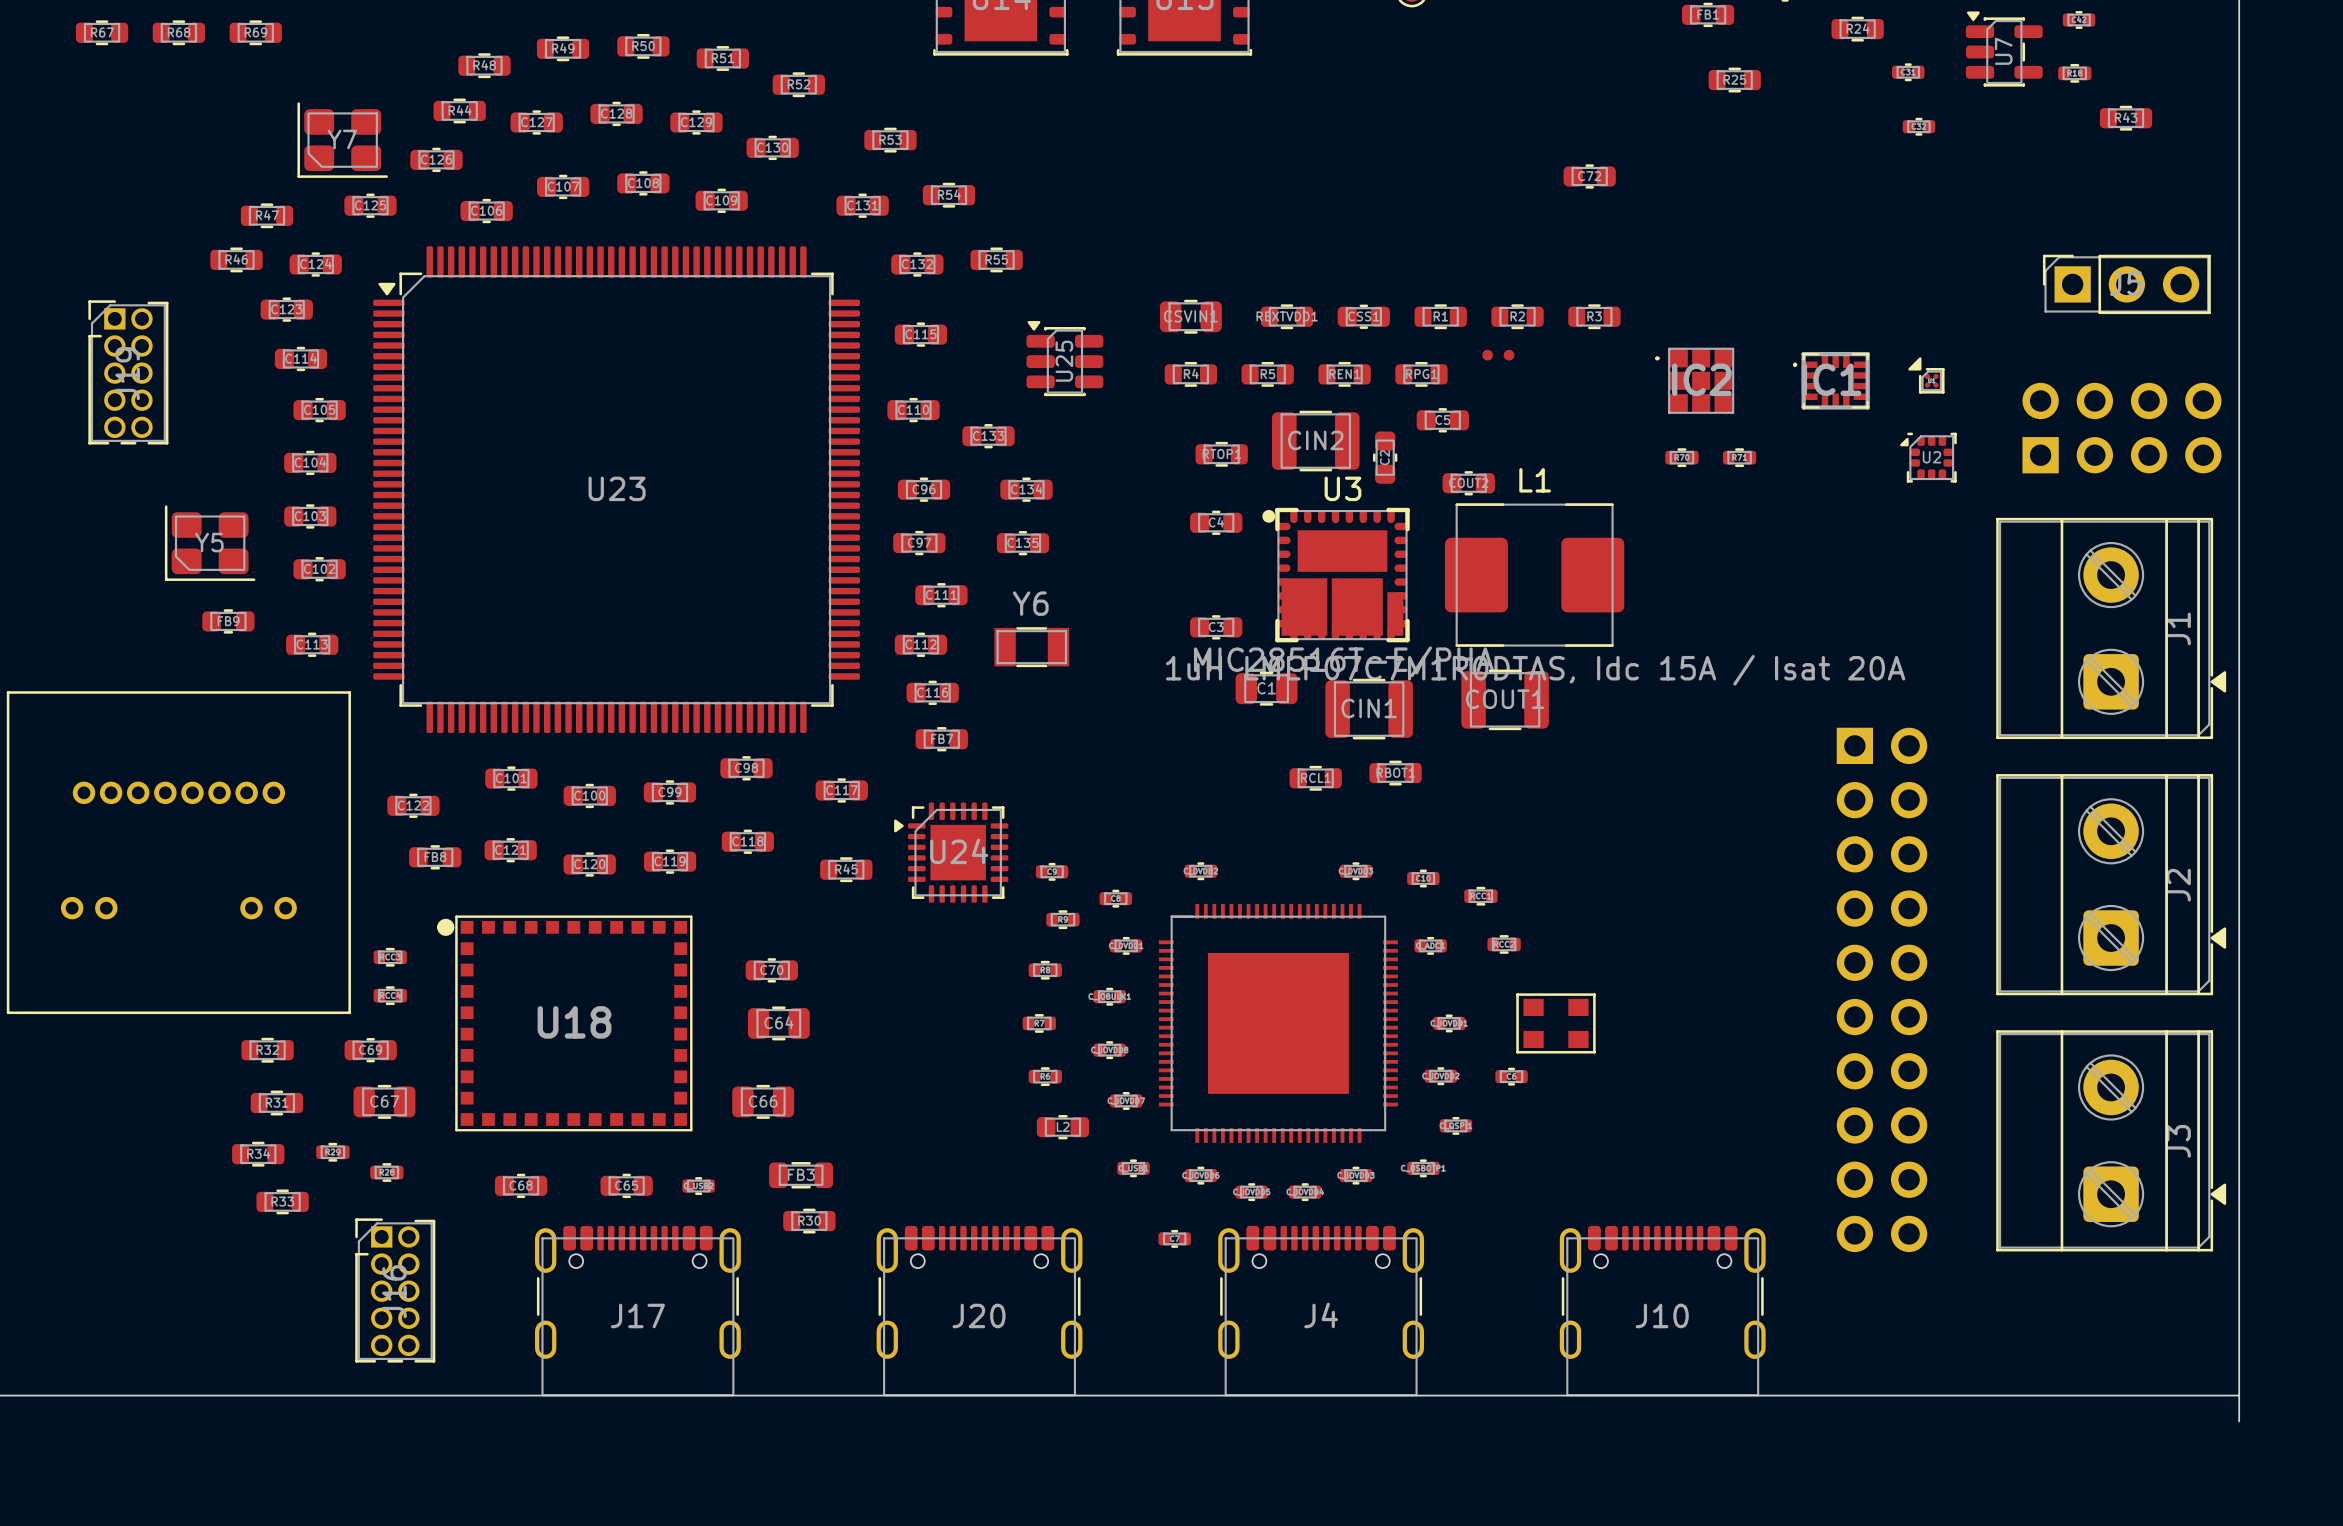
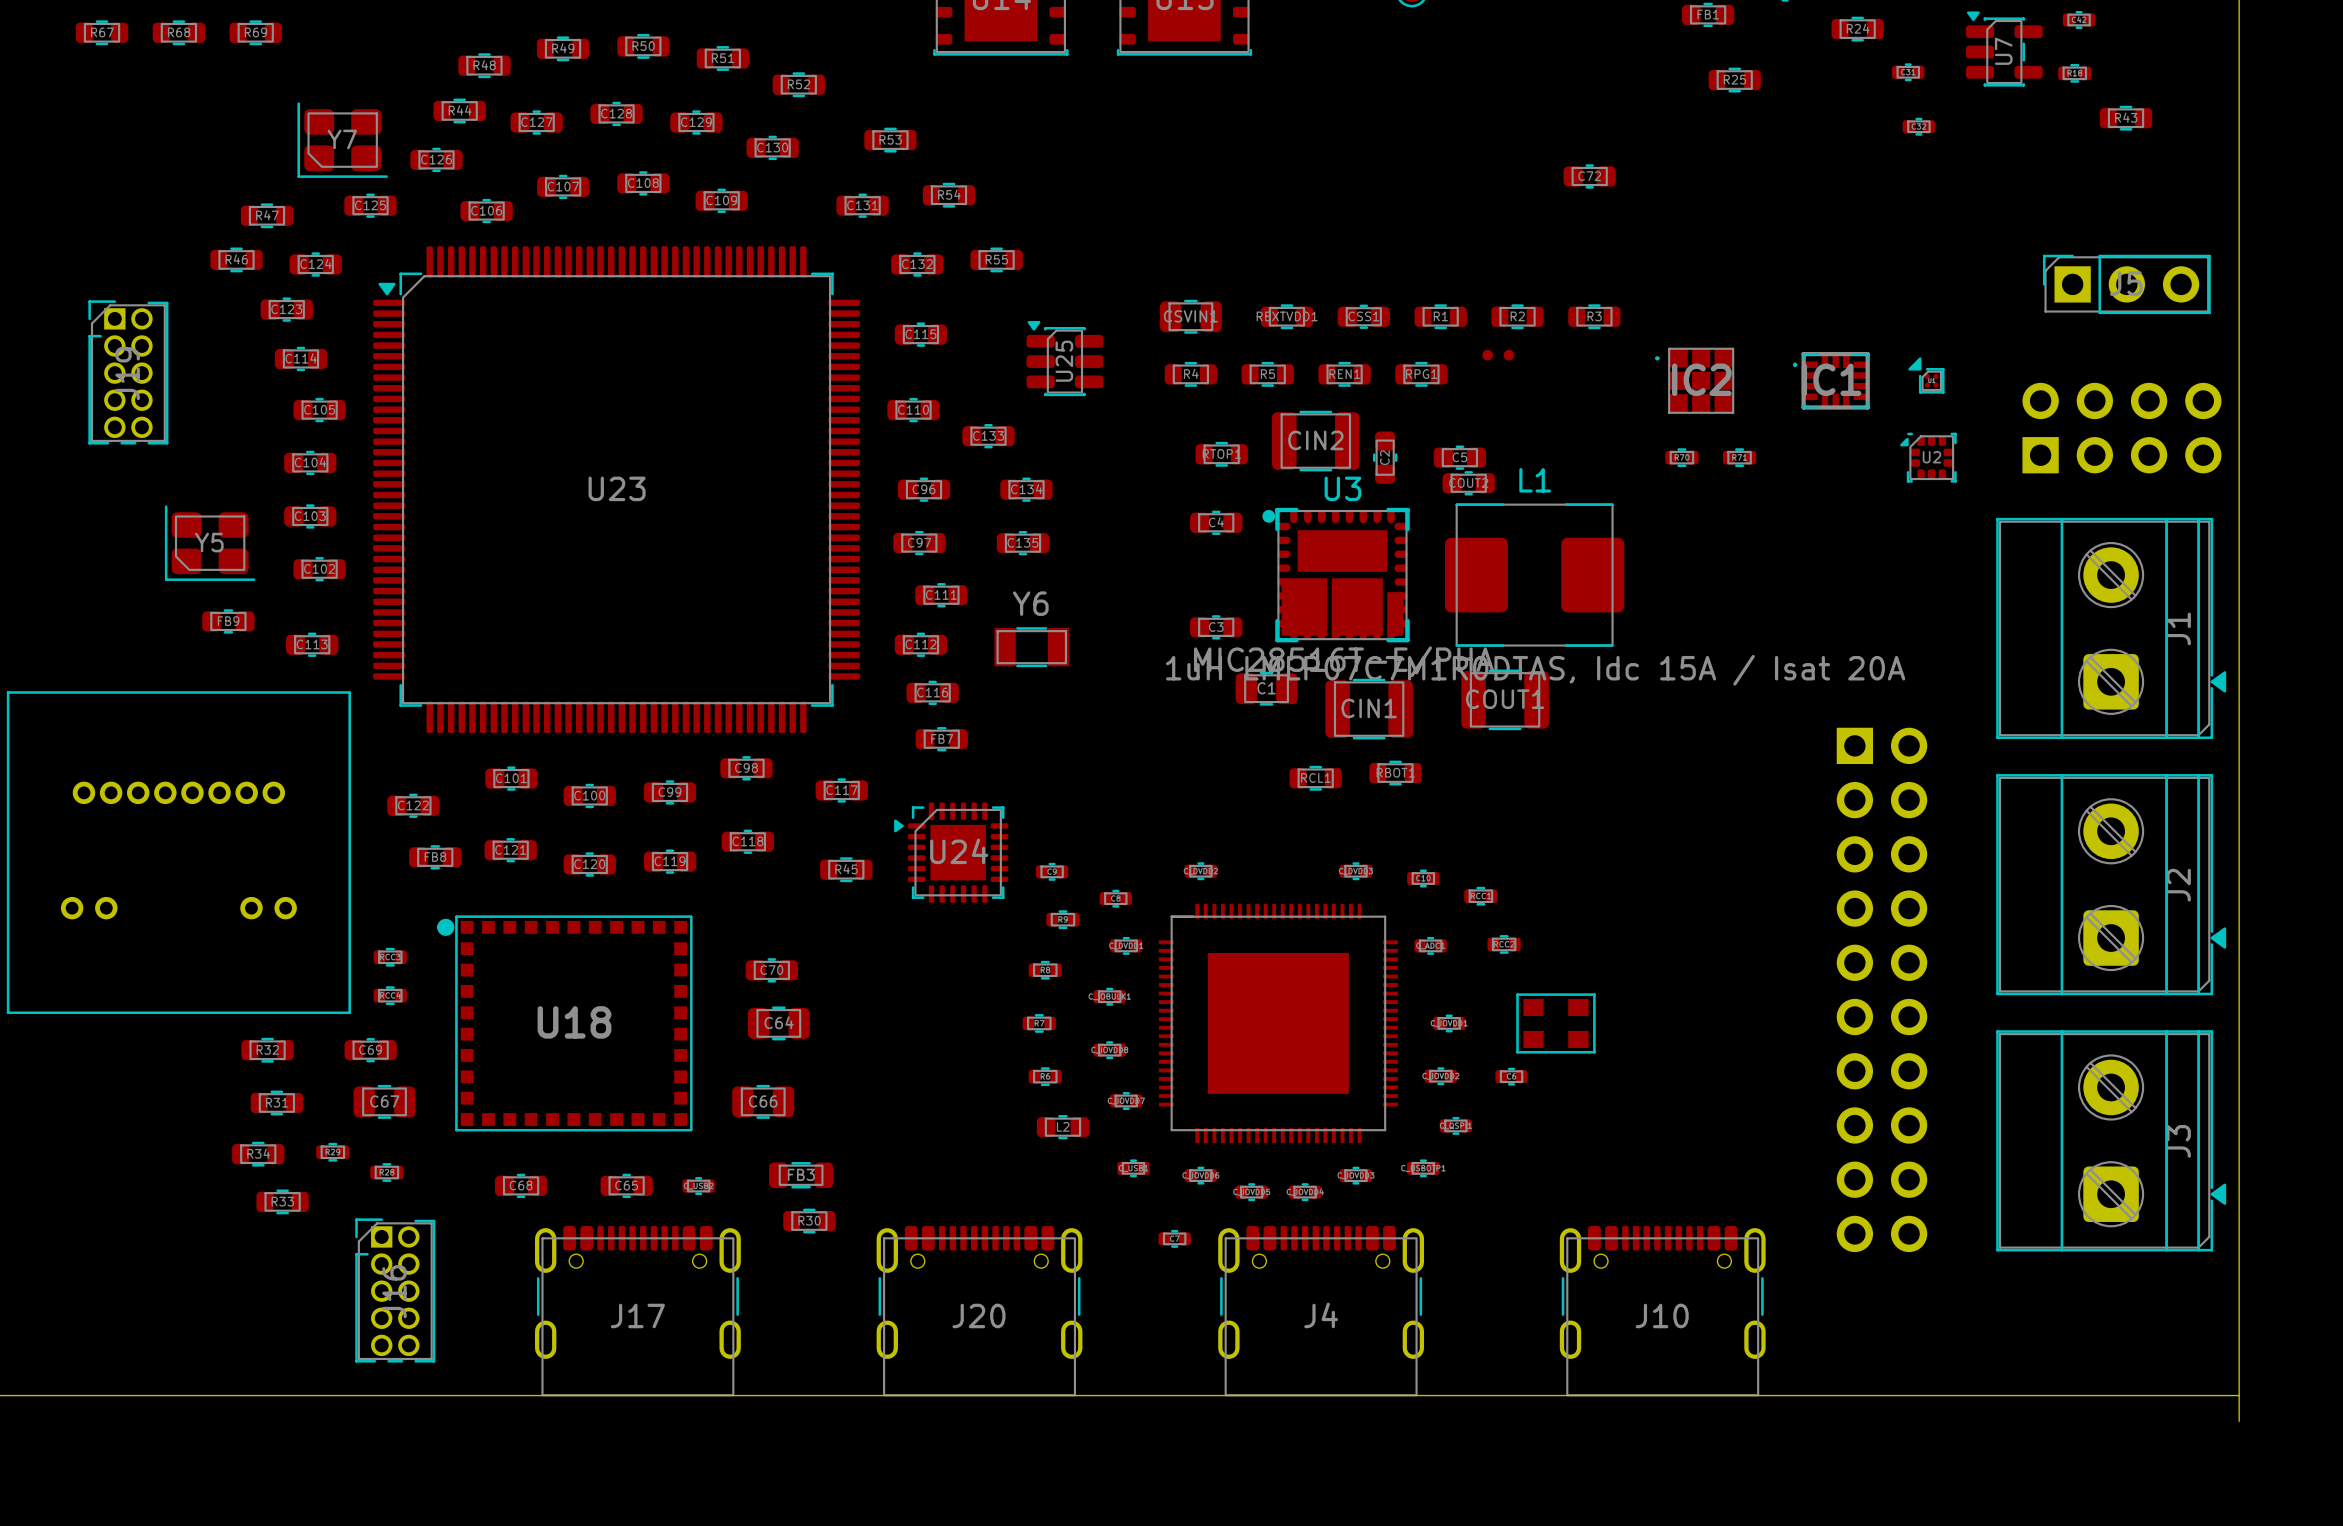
C5 position: (1442, 420) -> (1459, 457)

